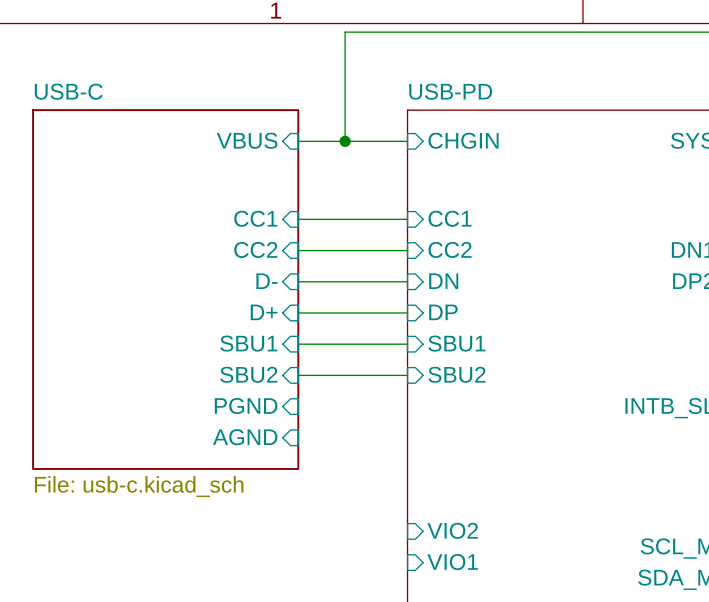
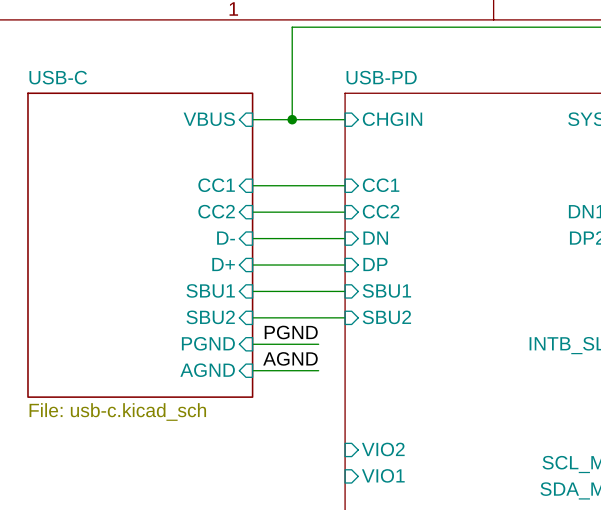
label: none -> PGND (291, 332)
wire: none -> (252, 344) (318, 344)
label: none -> AGND (290, 358)
wire: none -> (252, 370) (318, 370)

